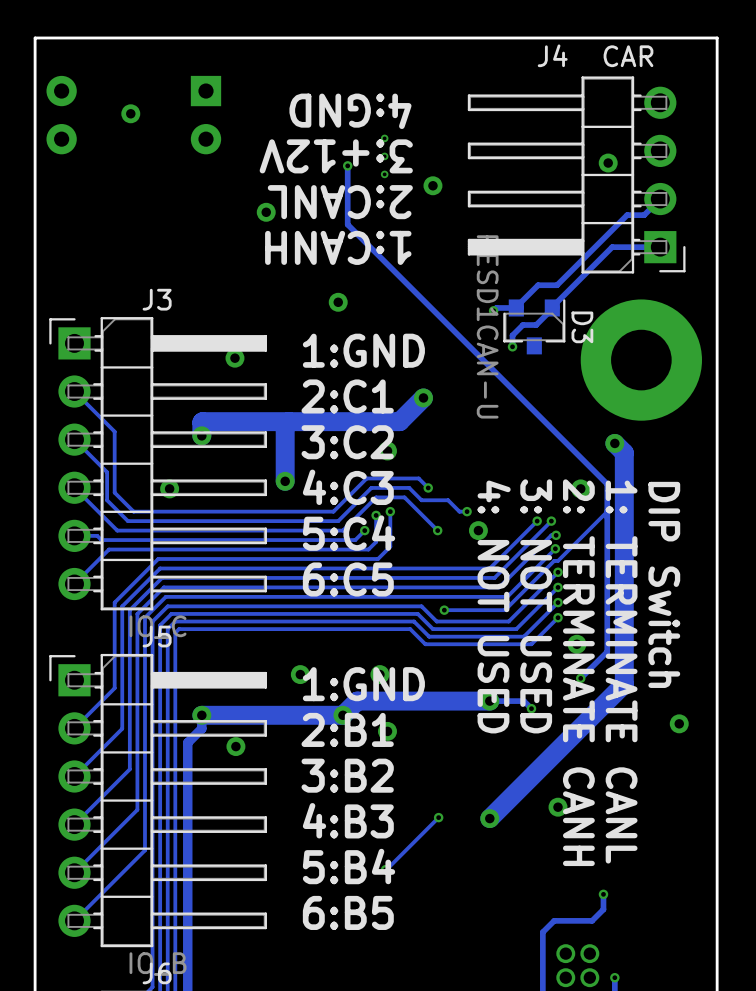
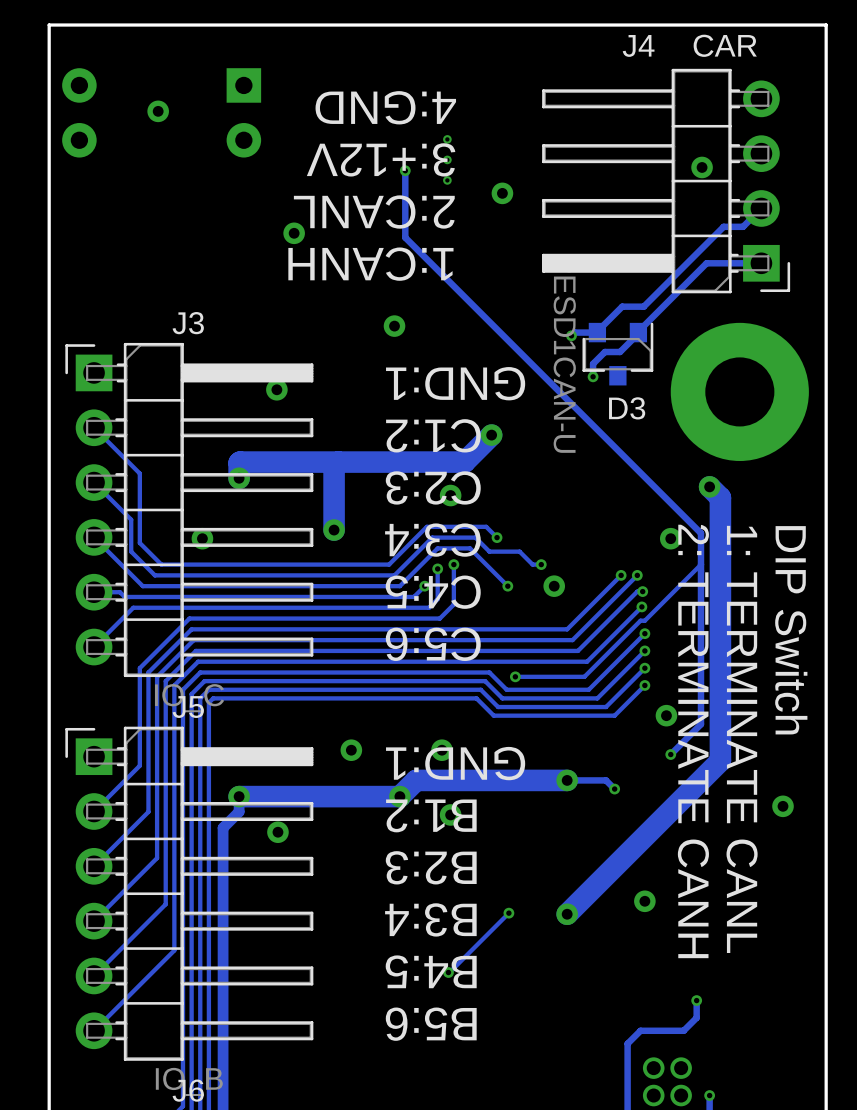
text position: 4:GND (350, 111) -> 4:GND (385, 107)
text position: 3:+12V (336, 156) -> 3:+12V (381, 159)
text position: 2:CANL (340, 202) -> 2:CANL (374, 212)
part position: (266, 212) -> (294, 233)
text position: 1:CANH (338, 247) -> 1:CANH (370, 264)
D3 name rotation: 0° (582, 327) -> 90° counterclockwise (627, 408)
D3 name position: D3 (582, 327) -> D3 (627, 408)
text: 1:GND (363, 350) -> none
text: none -> GND:1 (455, 383)
text: 2:C1 (347, 396) -> none
text: none -> C1:2 (433, 435)
text: 3:C2 (347, 442) -> none
text: none -> C2:3 (433, 487)
text: 4:C3 (348, 487) -> none
text: none -> C3:4 (432, 540)
text: 5:C4 (349, 533) -> none
text: none -> C4:5 (433, 592)
text: 6:C5 (348, 579) -> none
text: none -> C5:6 (433, 644)
text position: DIP Switch (664, 584) -> DIP Switch (791, 630)
text: 3: NOT USED (536, 606) -> none
text: 4: NOT USED (494, 607) -> none
text position: 2: TERMINATE CANH (578, 672) -> 2: TERMINATE CANH (693, 741)
text position: 1: TERMINATE CANL (621, 672) -> 1: TERMINATE CANL (742, 739)
text: 1:GND (363, 684) -> none
text: none -> GND:1 (455, 763)
text: 2:B1 (347, 729) -> none
text: none -> B1:2 (431, 815)
text: 3:B2 (347, 775) -> none
text: none -> B2:3 (431, 867)
text: 4:B3 (348, 820) -> none
text: none -> B3:4 (430, 919)
text: 5:B4 (349, 866) -> none
text: none -> B4:5 (431, 971)
text: 6:B5 (348, 912) -> none
text: none -> B5:6 (431, 1024)

